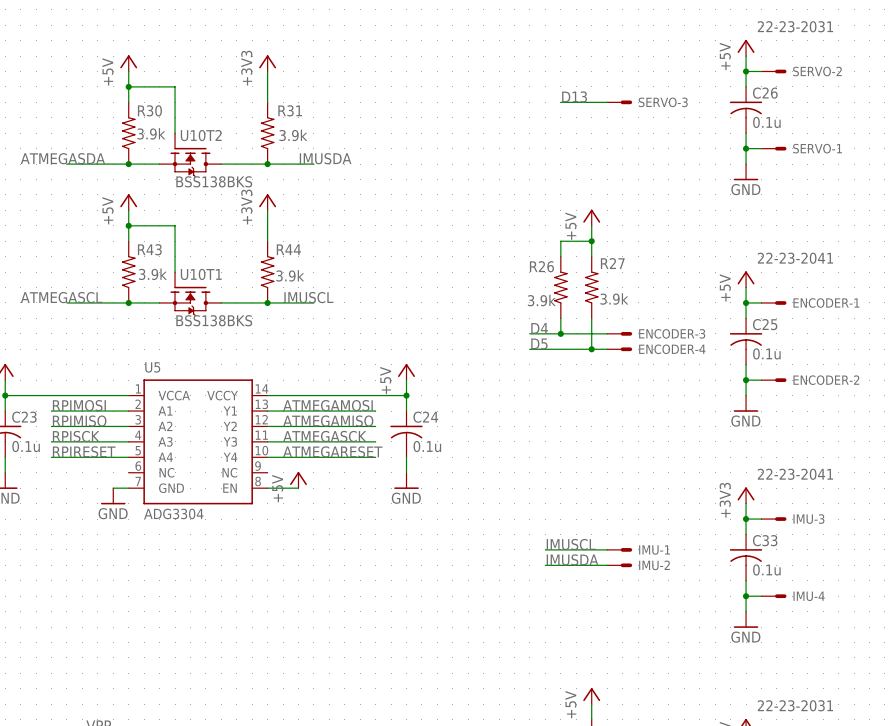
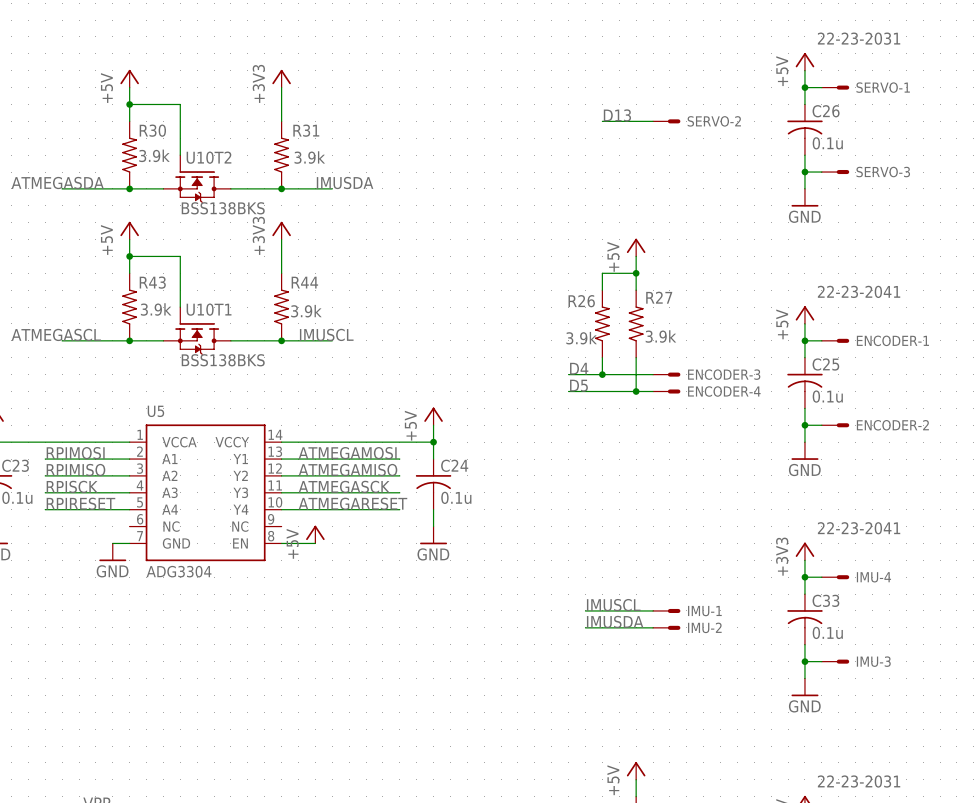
SERVO-2 name: SERVO-2 (817, 71) -> SERVO-1 (883, 87)
SERVO-3 name: SERVO-3 (663, 102) -> SERVO-2 (714, 121)
SERVO-1 name: SERVO-1 (817, 148) -> SERVO-3 (883, 172)
IMU-3 name: IMU-3 (808, 519) -> IMU-4 (873, 577)
IMU-4 name: IMU-4 (809, 596) -> IMU-3 (873, 661)

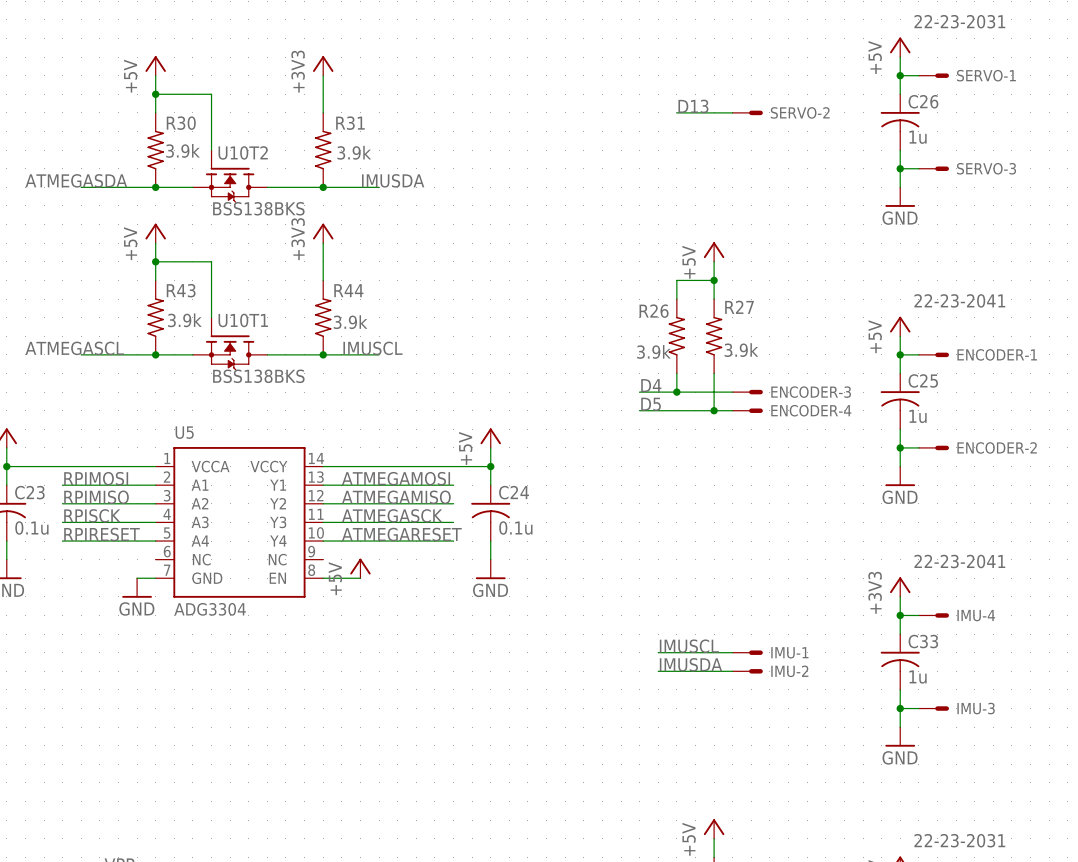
C26 value: 0.1u (827, 143) -> 1u (918, 137)
C25 value: 0.1u (827, 396) -> 1u (918, 416)
C33 value: 0.1u (827, 632) -> 1u (918, 677)

